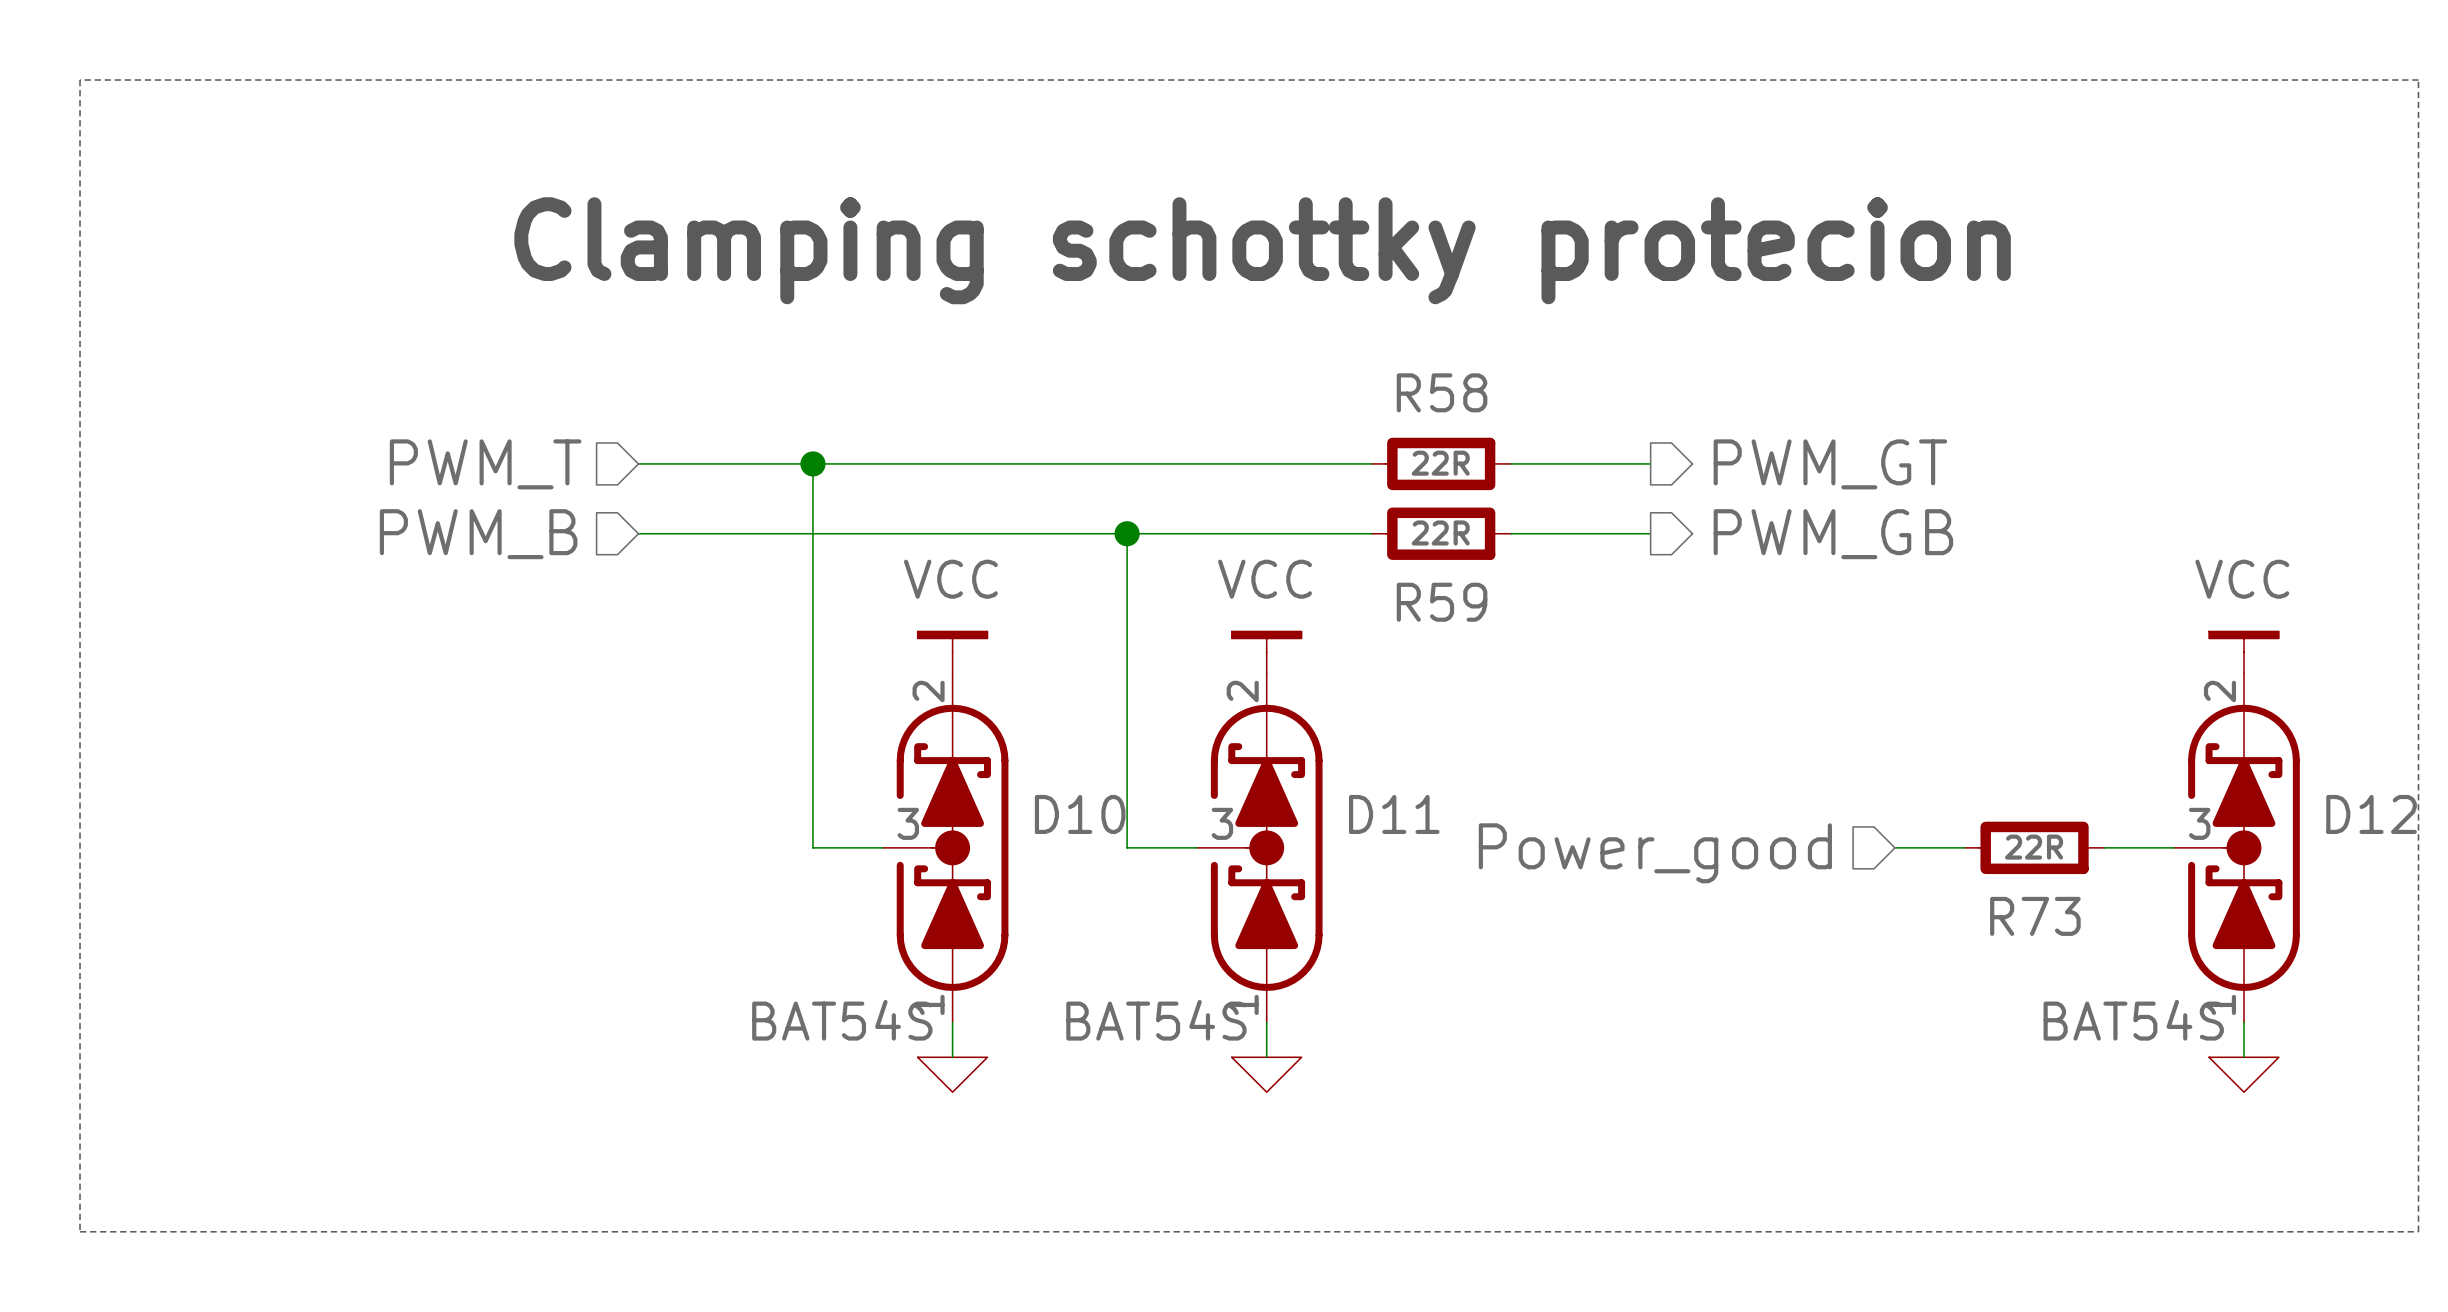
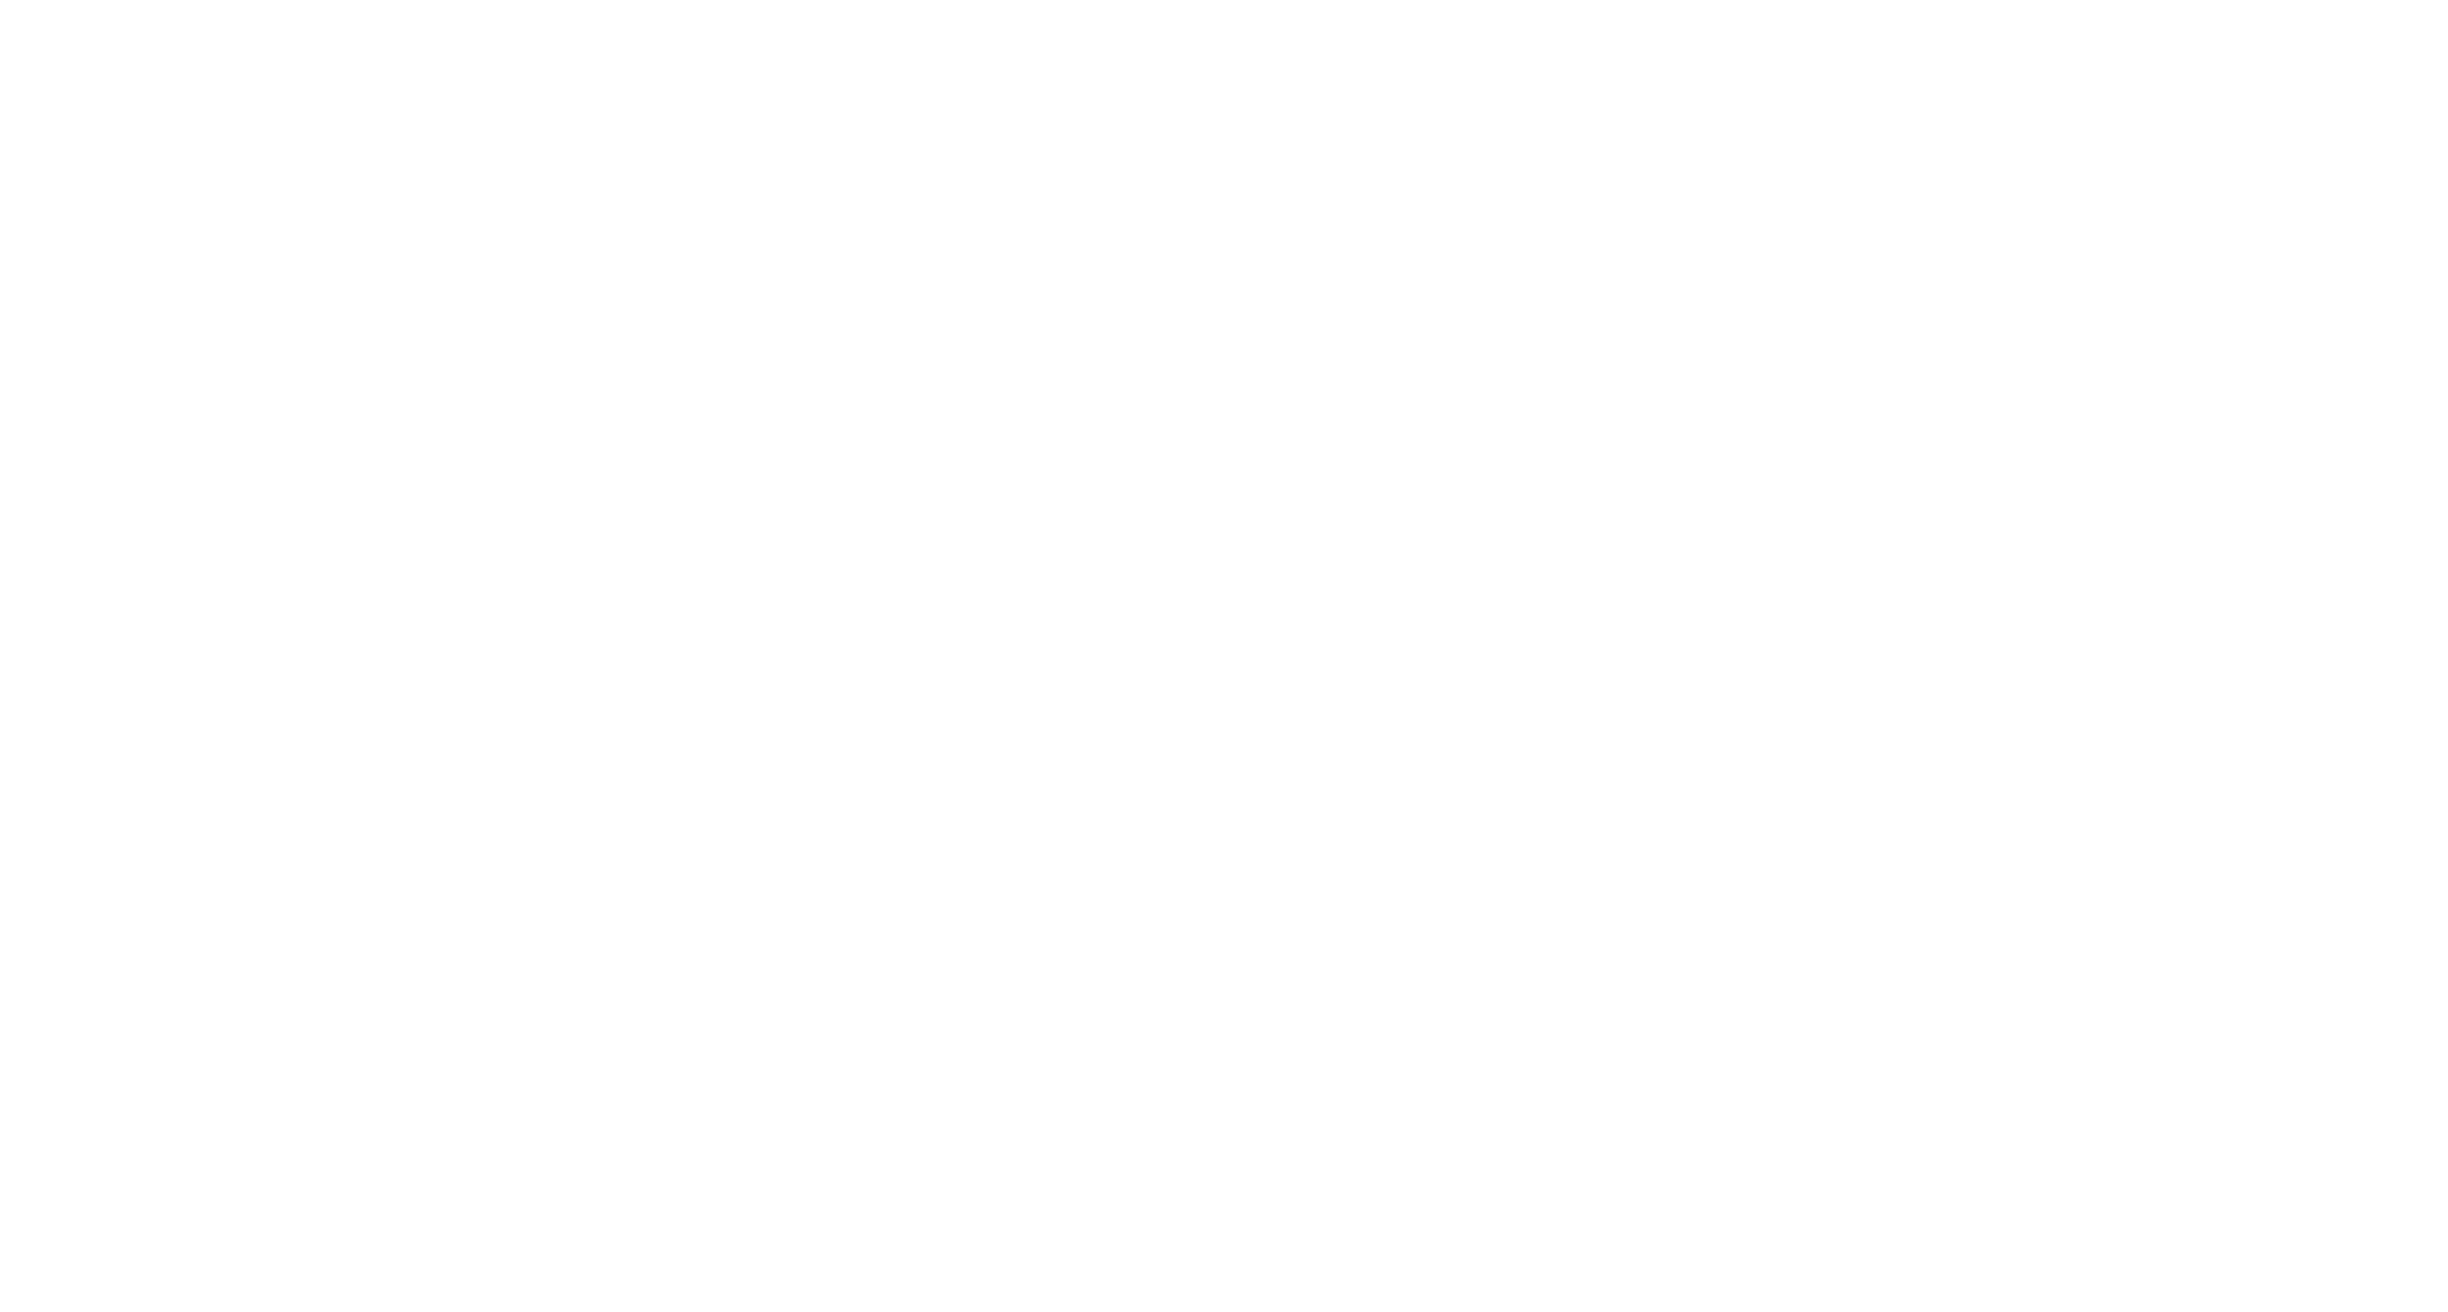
line: (80, 80) (80, 1231) (2418, 1231) (2418, 80) (80, 80) -> none
text: Clamping schottky protecion (1262, 250) -> none
wire: (638, 463) (1371, 463) -> none
wire: (812, 463) (812, 847) (882, 847) -> none
junction: (812, 463) -> none
R58: 22R (1441, 463) -> none
wire: (1511, 463) (1650, 463) -> none
hierarchical label: PWM_T (485, 464) -> none
hierarchical label: PWM_GT (1830, 464) -> none
wire: (638, 533) (1371, 533) -> none
wire: (1127, 533) (1127, 847) (1196, 847) -> none
junction: (1127, 533) -> none
R59: 22R (1441, 533) -> none
wire: (1511, 533) (1650, 533) -> none
hierarchical label: PWM_B (478, 534) -> none
hierarchical label: PWM_GB (1833, 534) -> none
power symbol: VCC (952, 652) -> none
power symbol: VCC (1266, 652) -> none
power symbol: VCC (2243, 652) -> none
D10: BAT54S (945, 847) -> none
D11: BAT54S (1259, 847) -> none
wire: (1894, 847) (1964, 847) -> none
R73: 22R (2034, 847) -> none
wire: (2104, 847) (2174, 847) -> none
D12: BAT54S (2237, 847) -> none
hierarchical label: Power_good (1655, 853) -> none
wire: (952, 1022) (952, 1057) -> none
wire: (1266, 1022) (1266, 1057) -> none
wire: (2243, 1022) (2243, 1057) -> none
power symbol: (952, 1074) -> none
power symbol: (1266, 1074) -> none
power symbol: (2243, 1074) -> none

